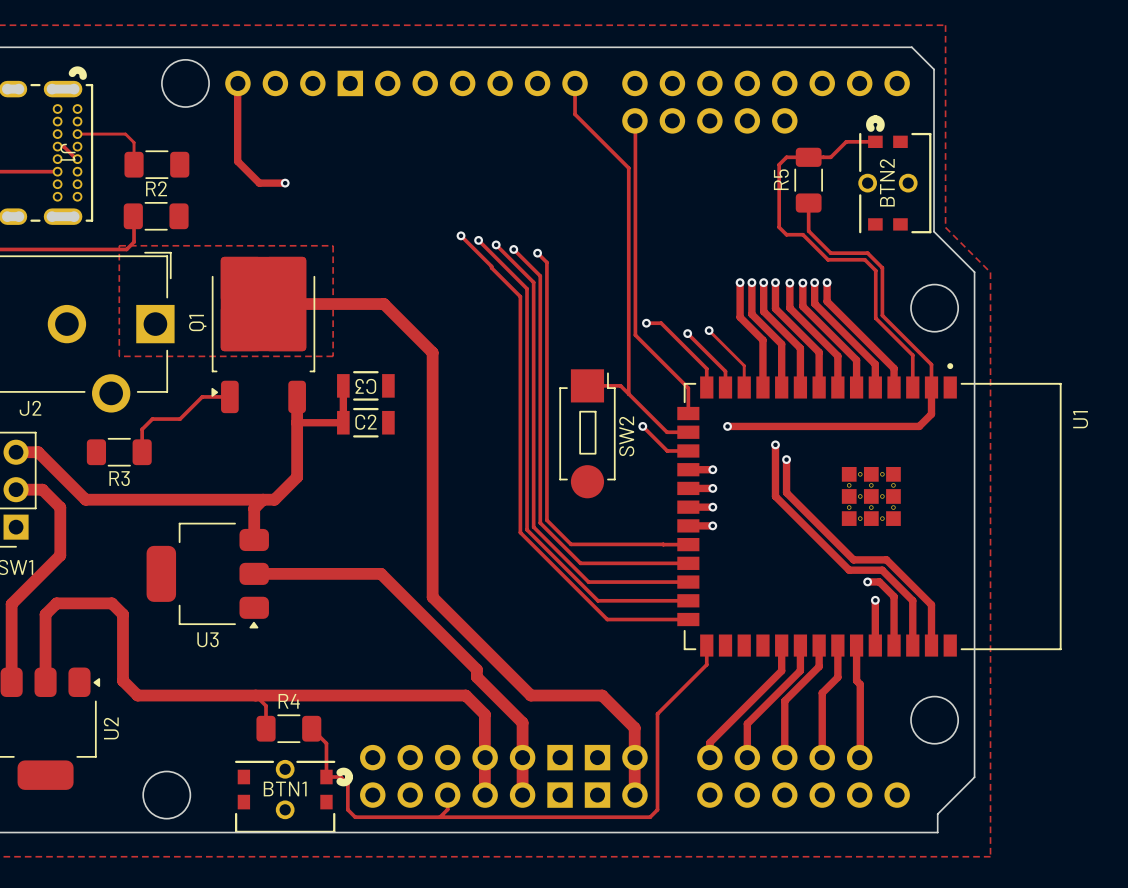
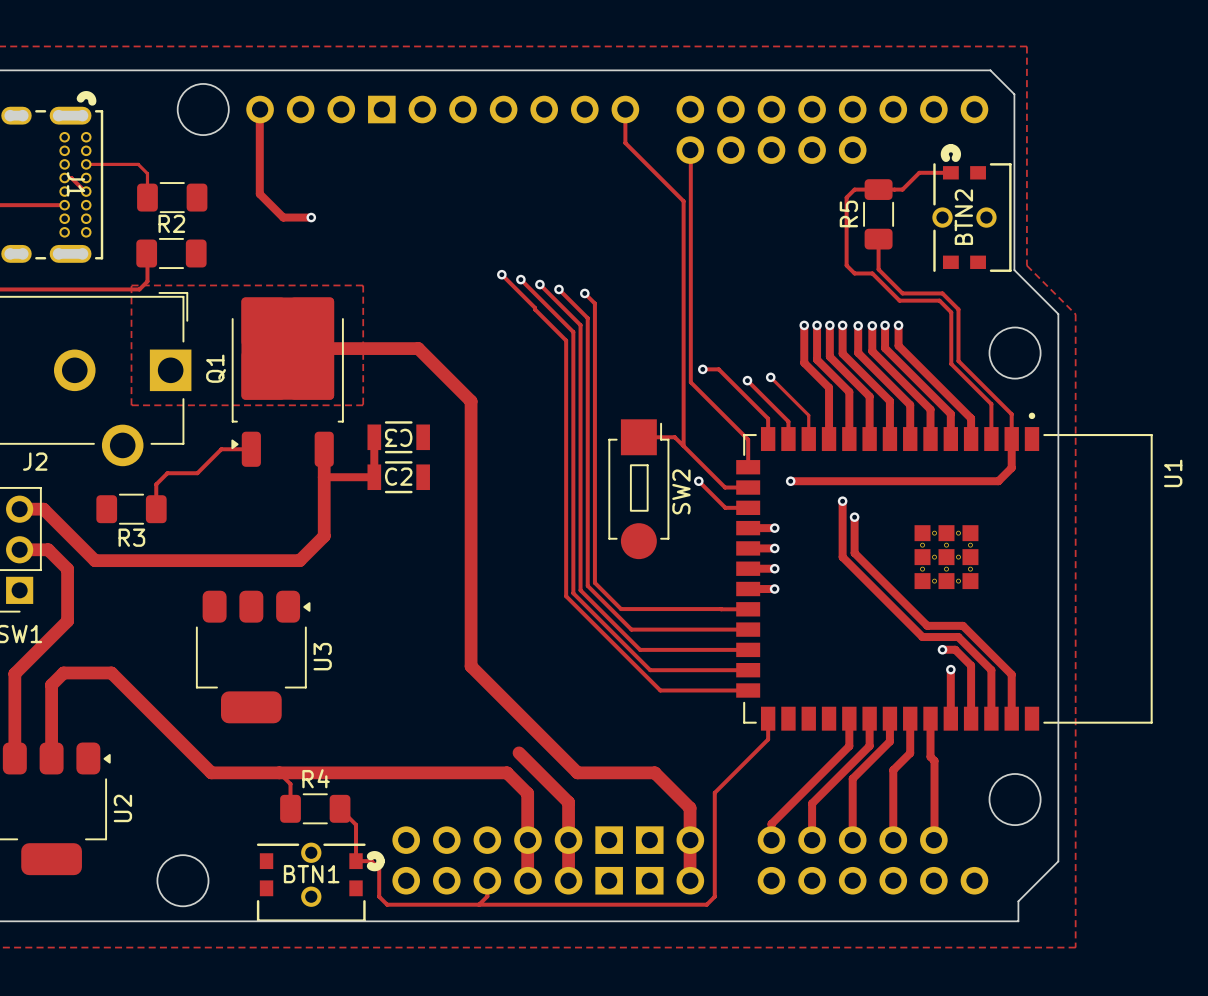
track: (263, 499) (254, 508) (254, 539) -> none
track: (254, 573) (381, 573) (476, 669) (476, 677) -> none
U3 rotation: 0° (207, 575) -> 90° counterclockwise (253, 657)
track: (100, 603) (111, 603) (122, 614) (122, 680) (137, 695) (193, 695) -> (111, 672) (211, 772)

